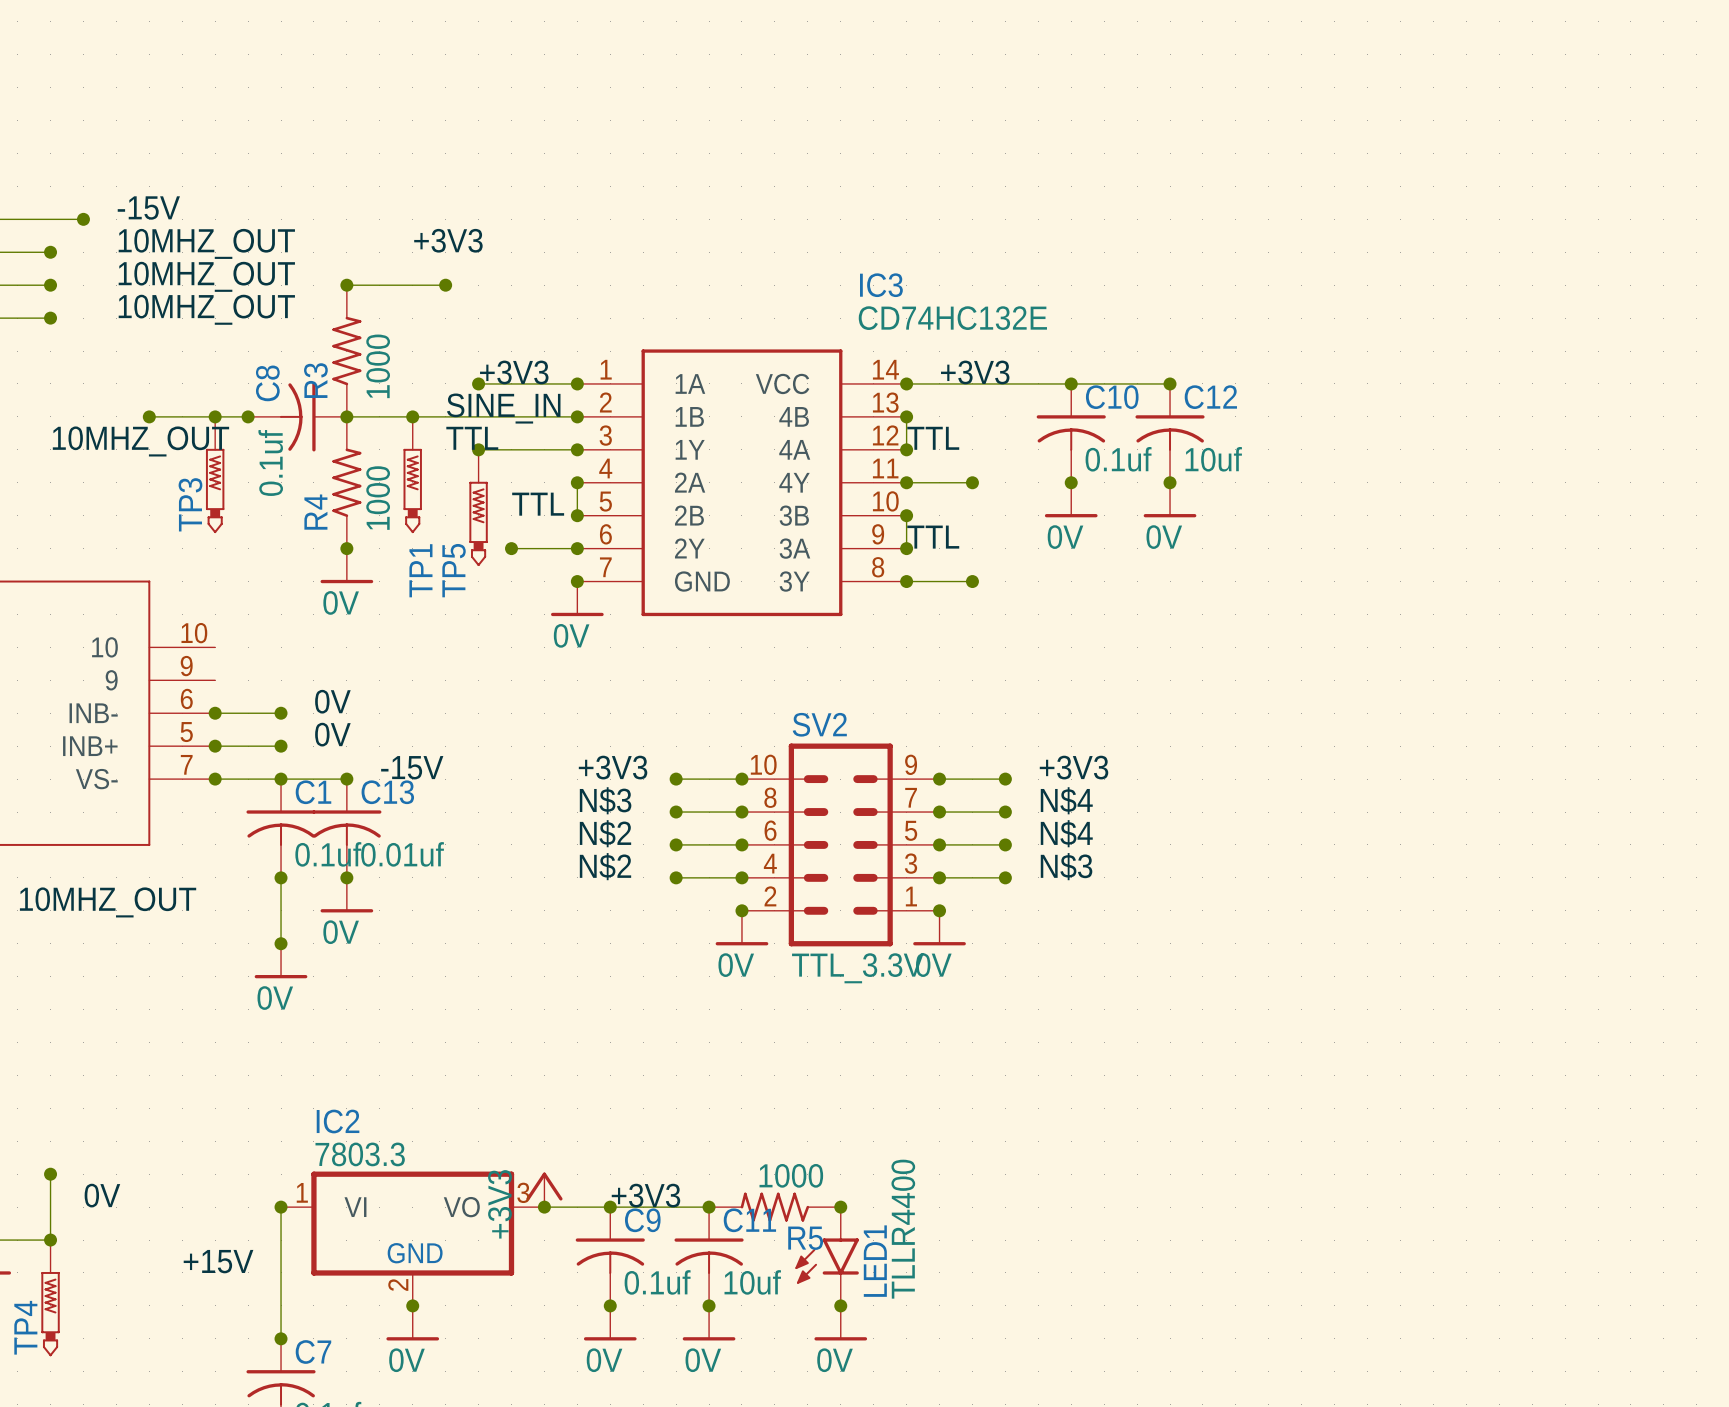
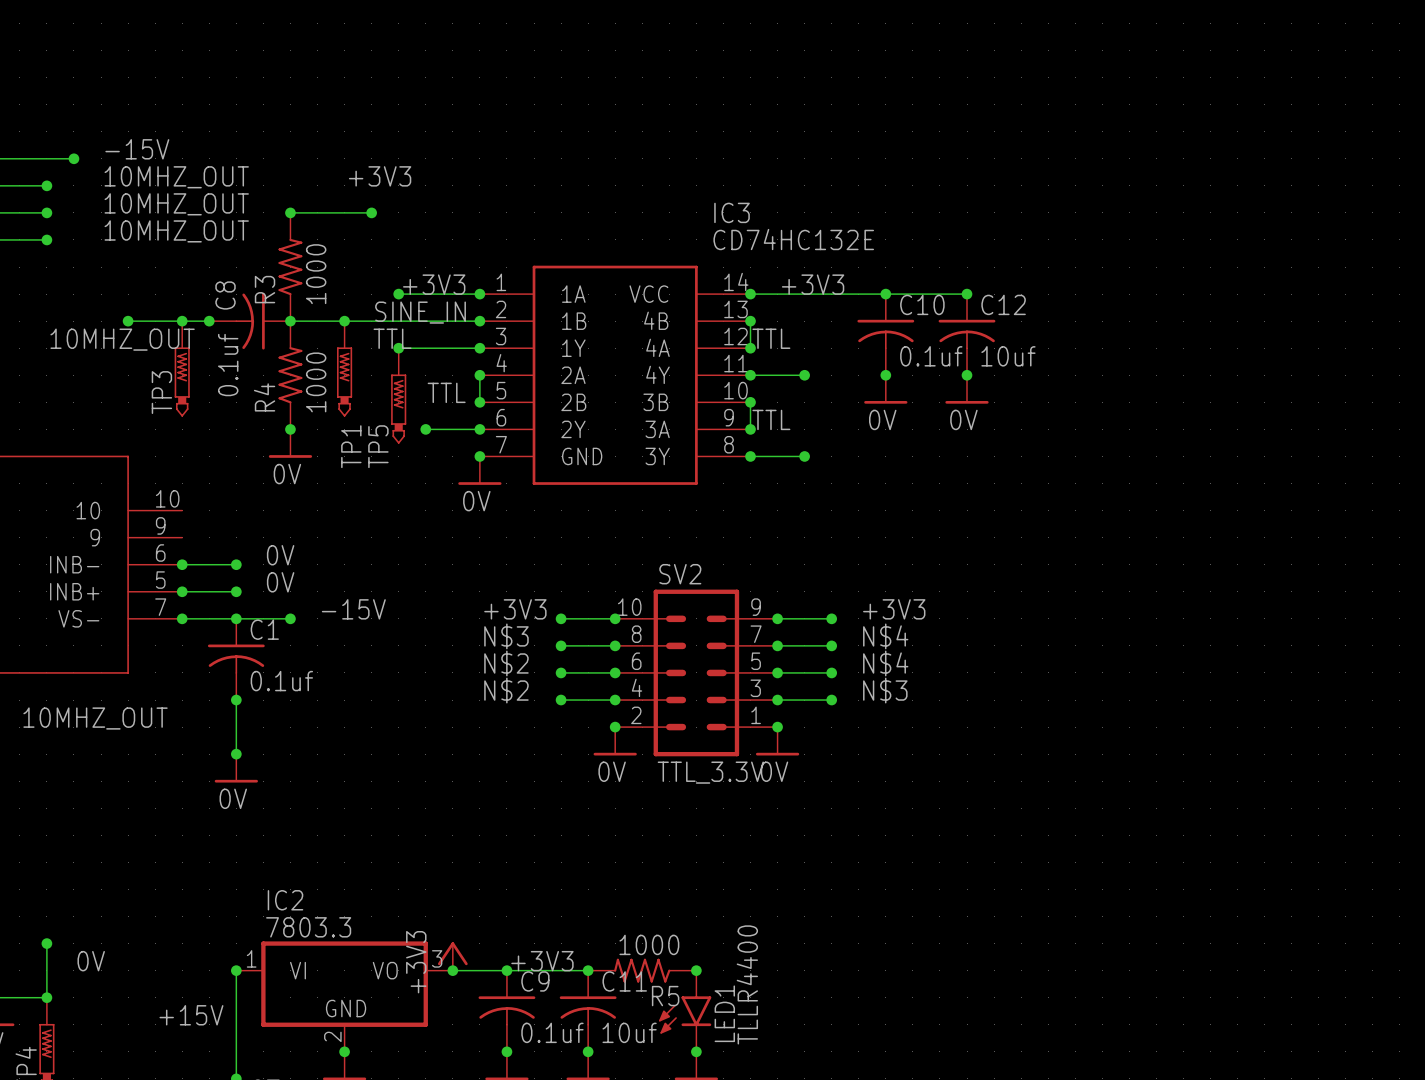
C13: 0.01uf (346, 828) -> none
junction: (346, 877) -> none
power symbol: 0V (346, 895) -> none

